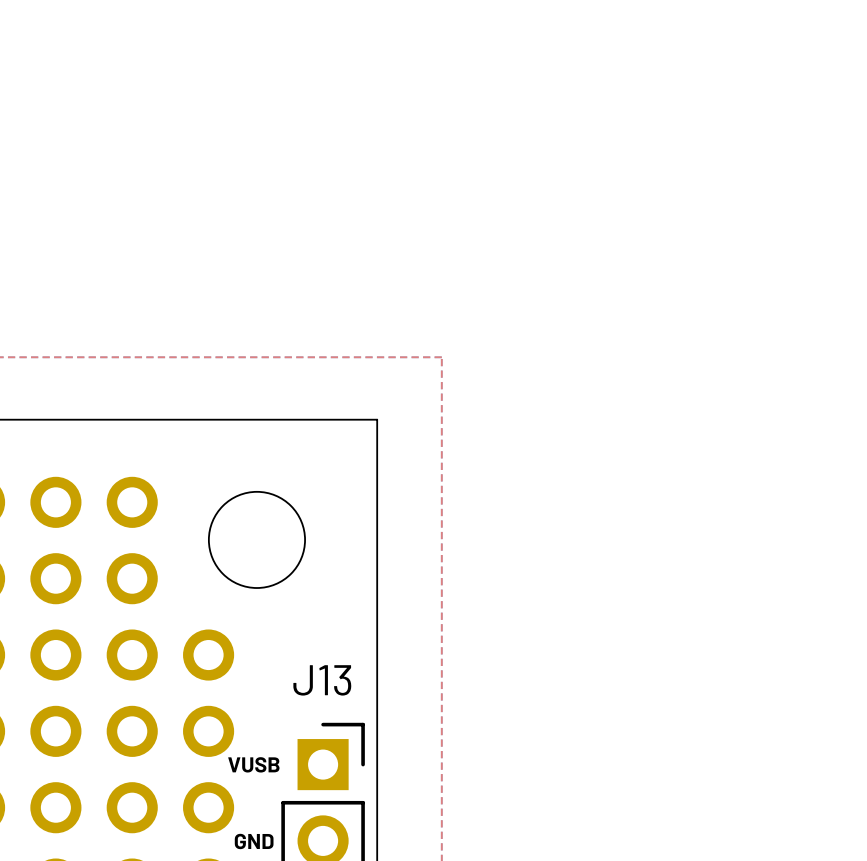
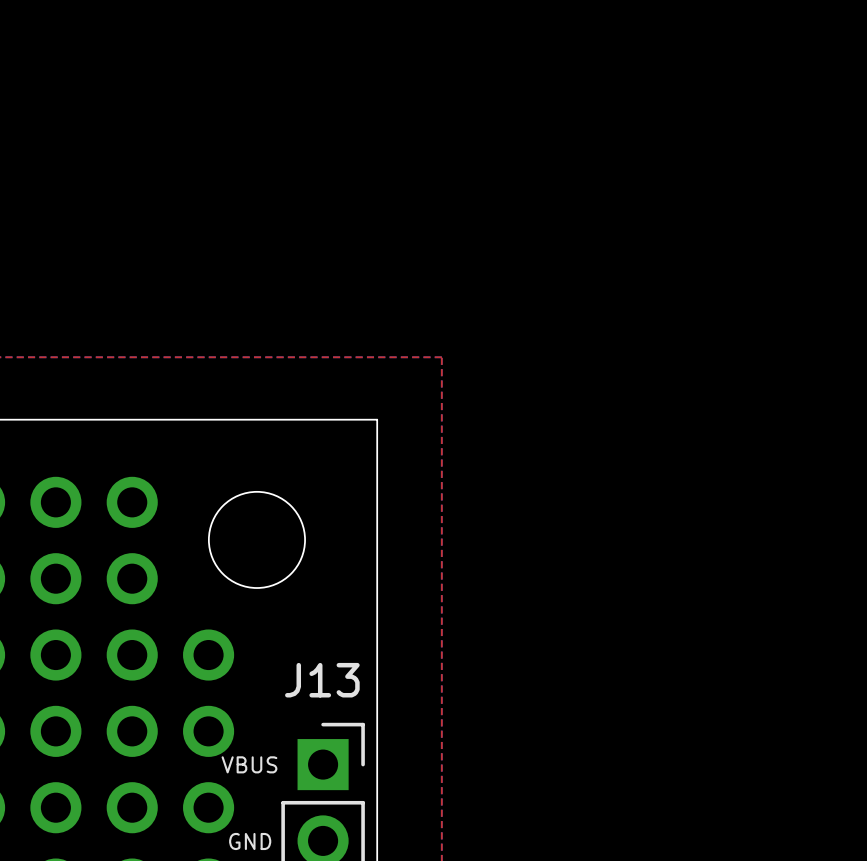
text: VUSB (253, 764) -> VBUS (249, 764)

